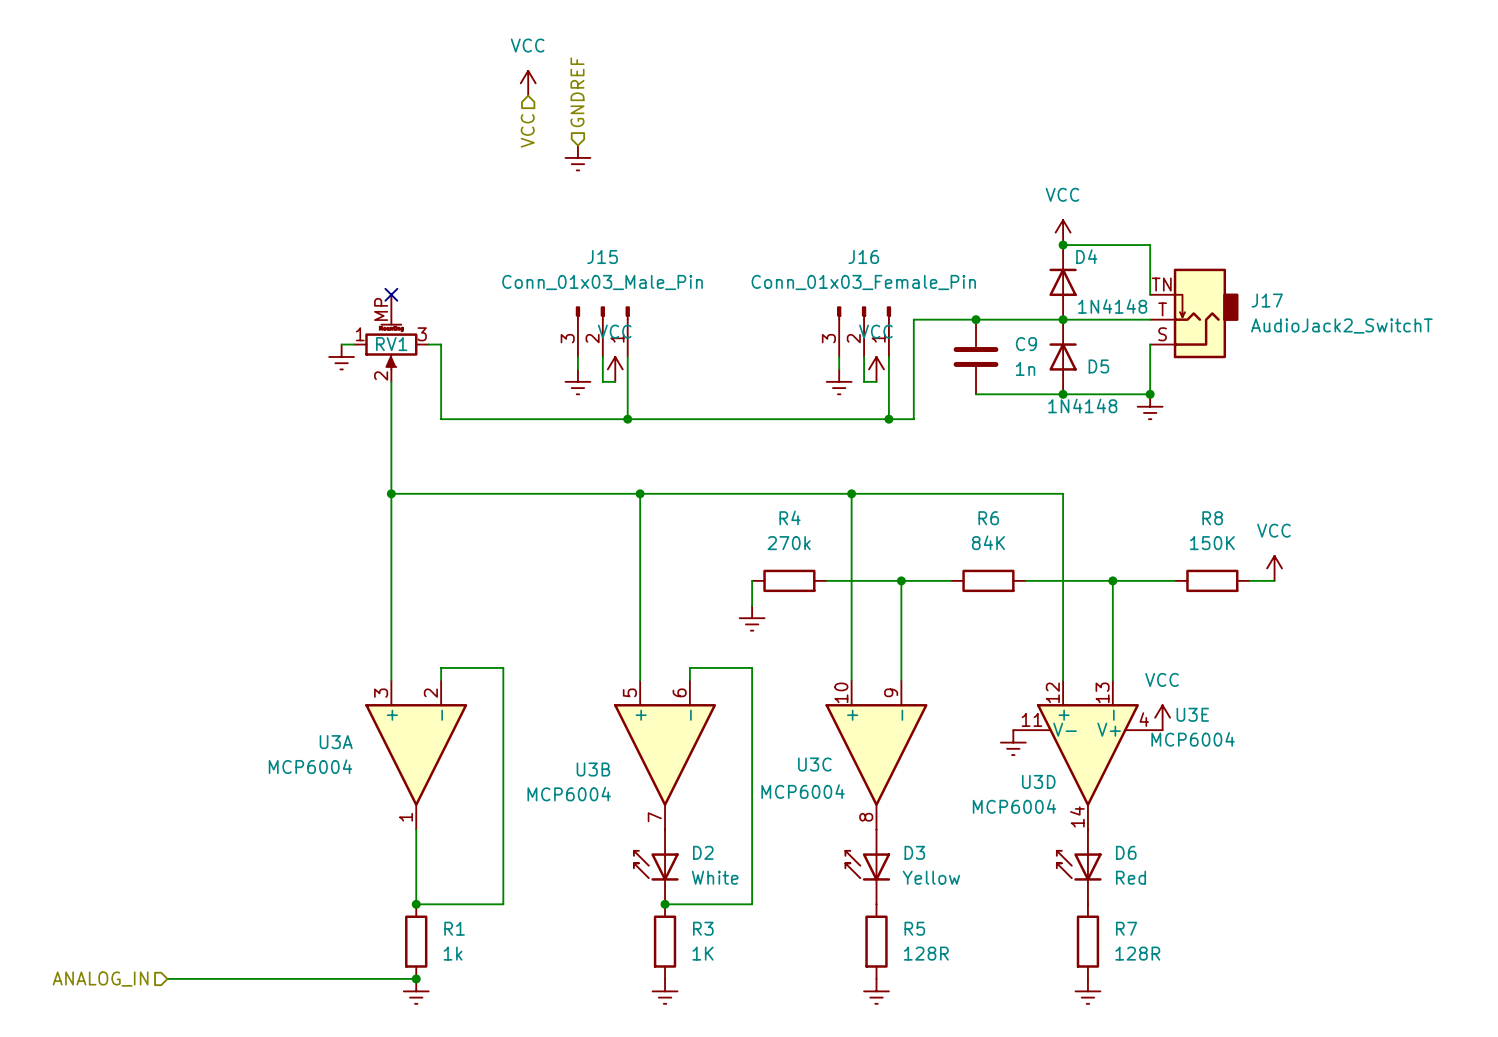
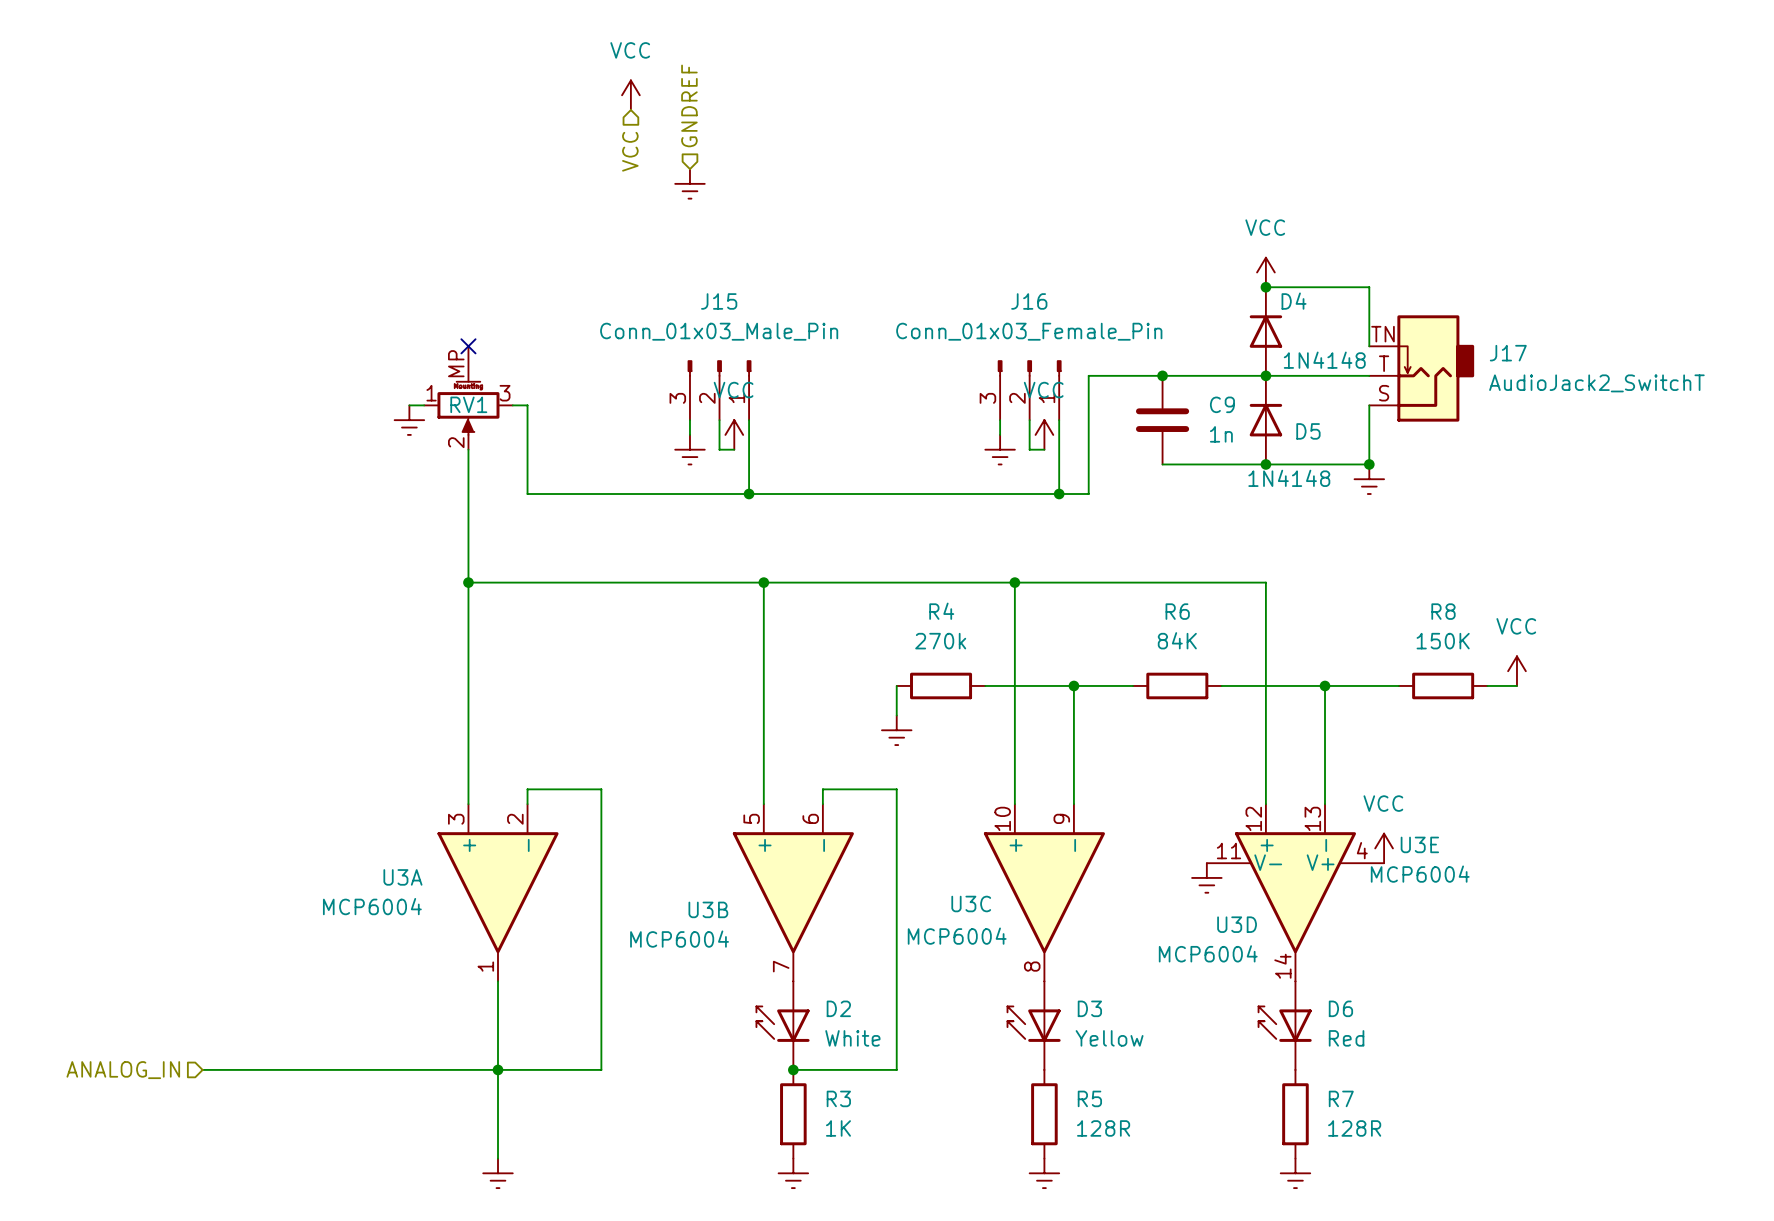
R1: 1k (416, 941) -> none
wire: (167, 978) (416, 978) -> (202, 1069) (498, 1069) (498, 1158)
junction: (416, 978) -> none
hierarchical label position: ANALOG_IN (100, 979) -> ANALOG_IN (123, 1070)

